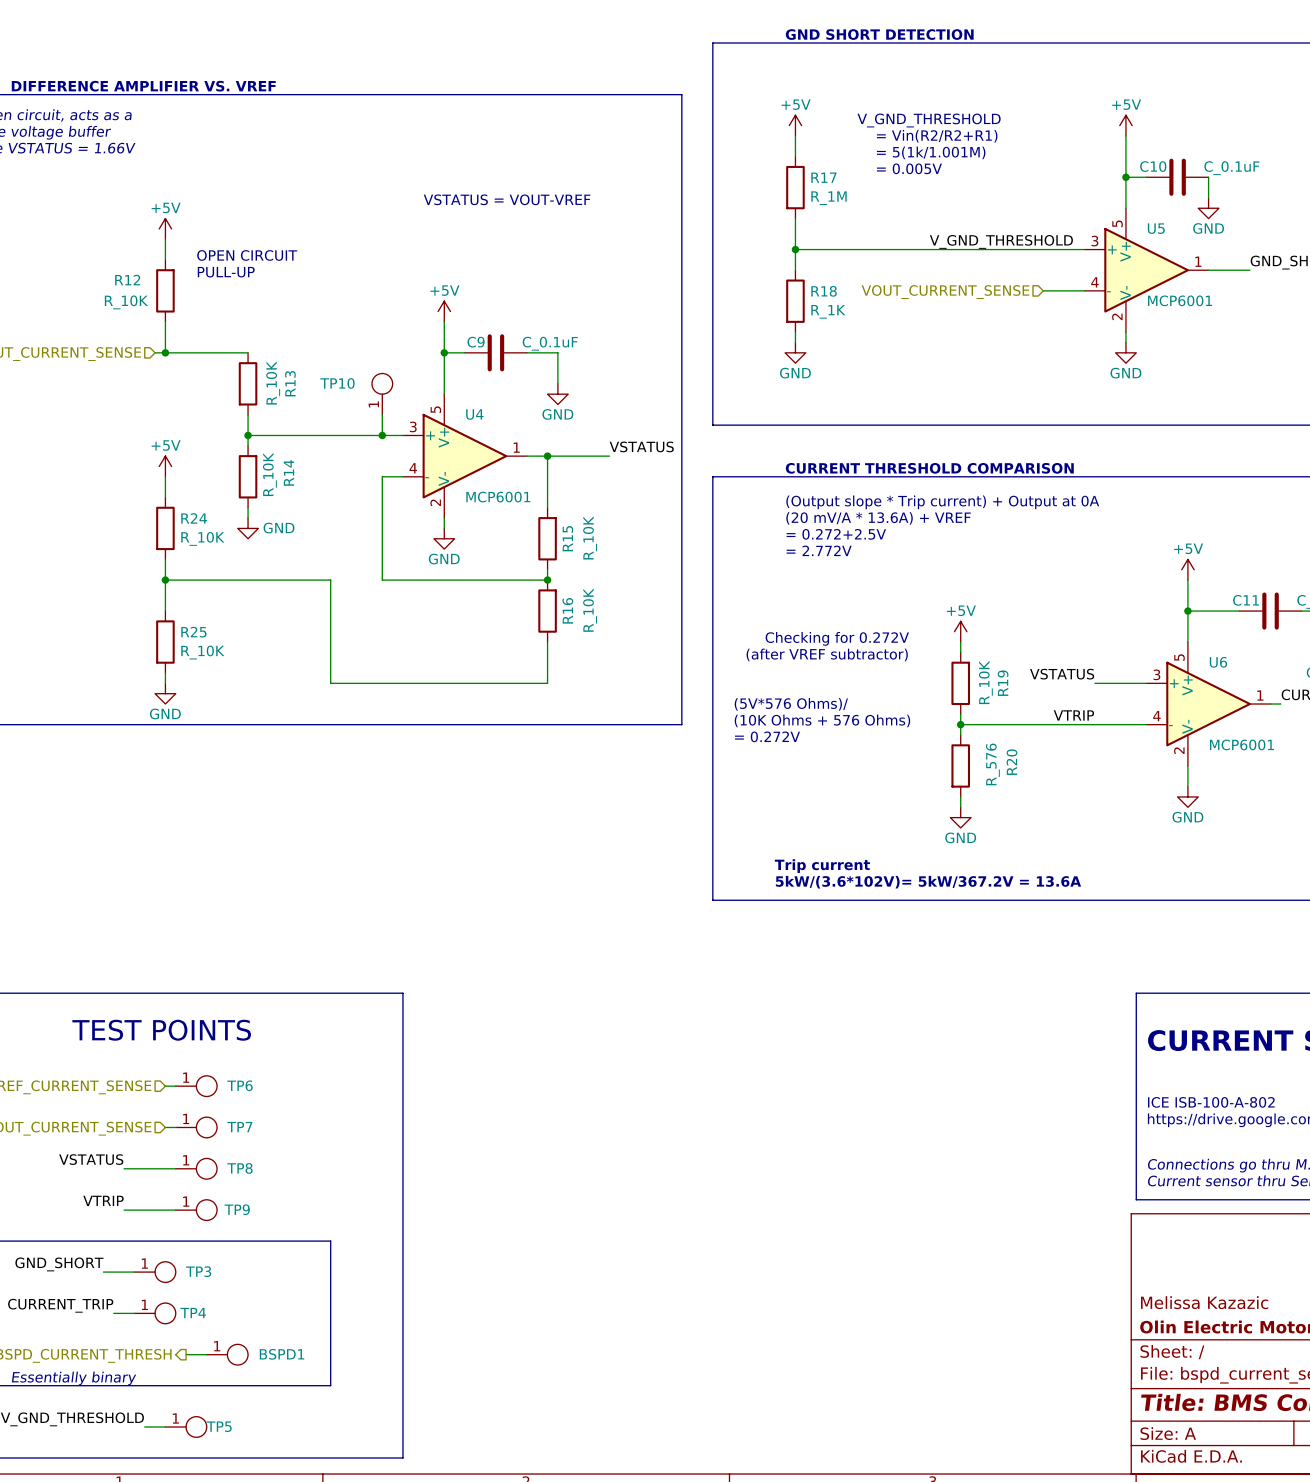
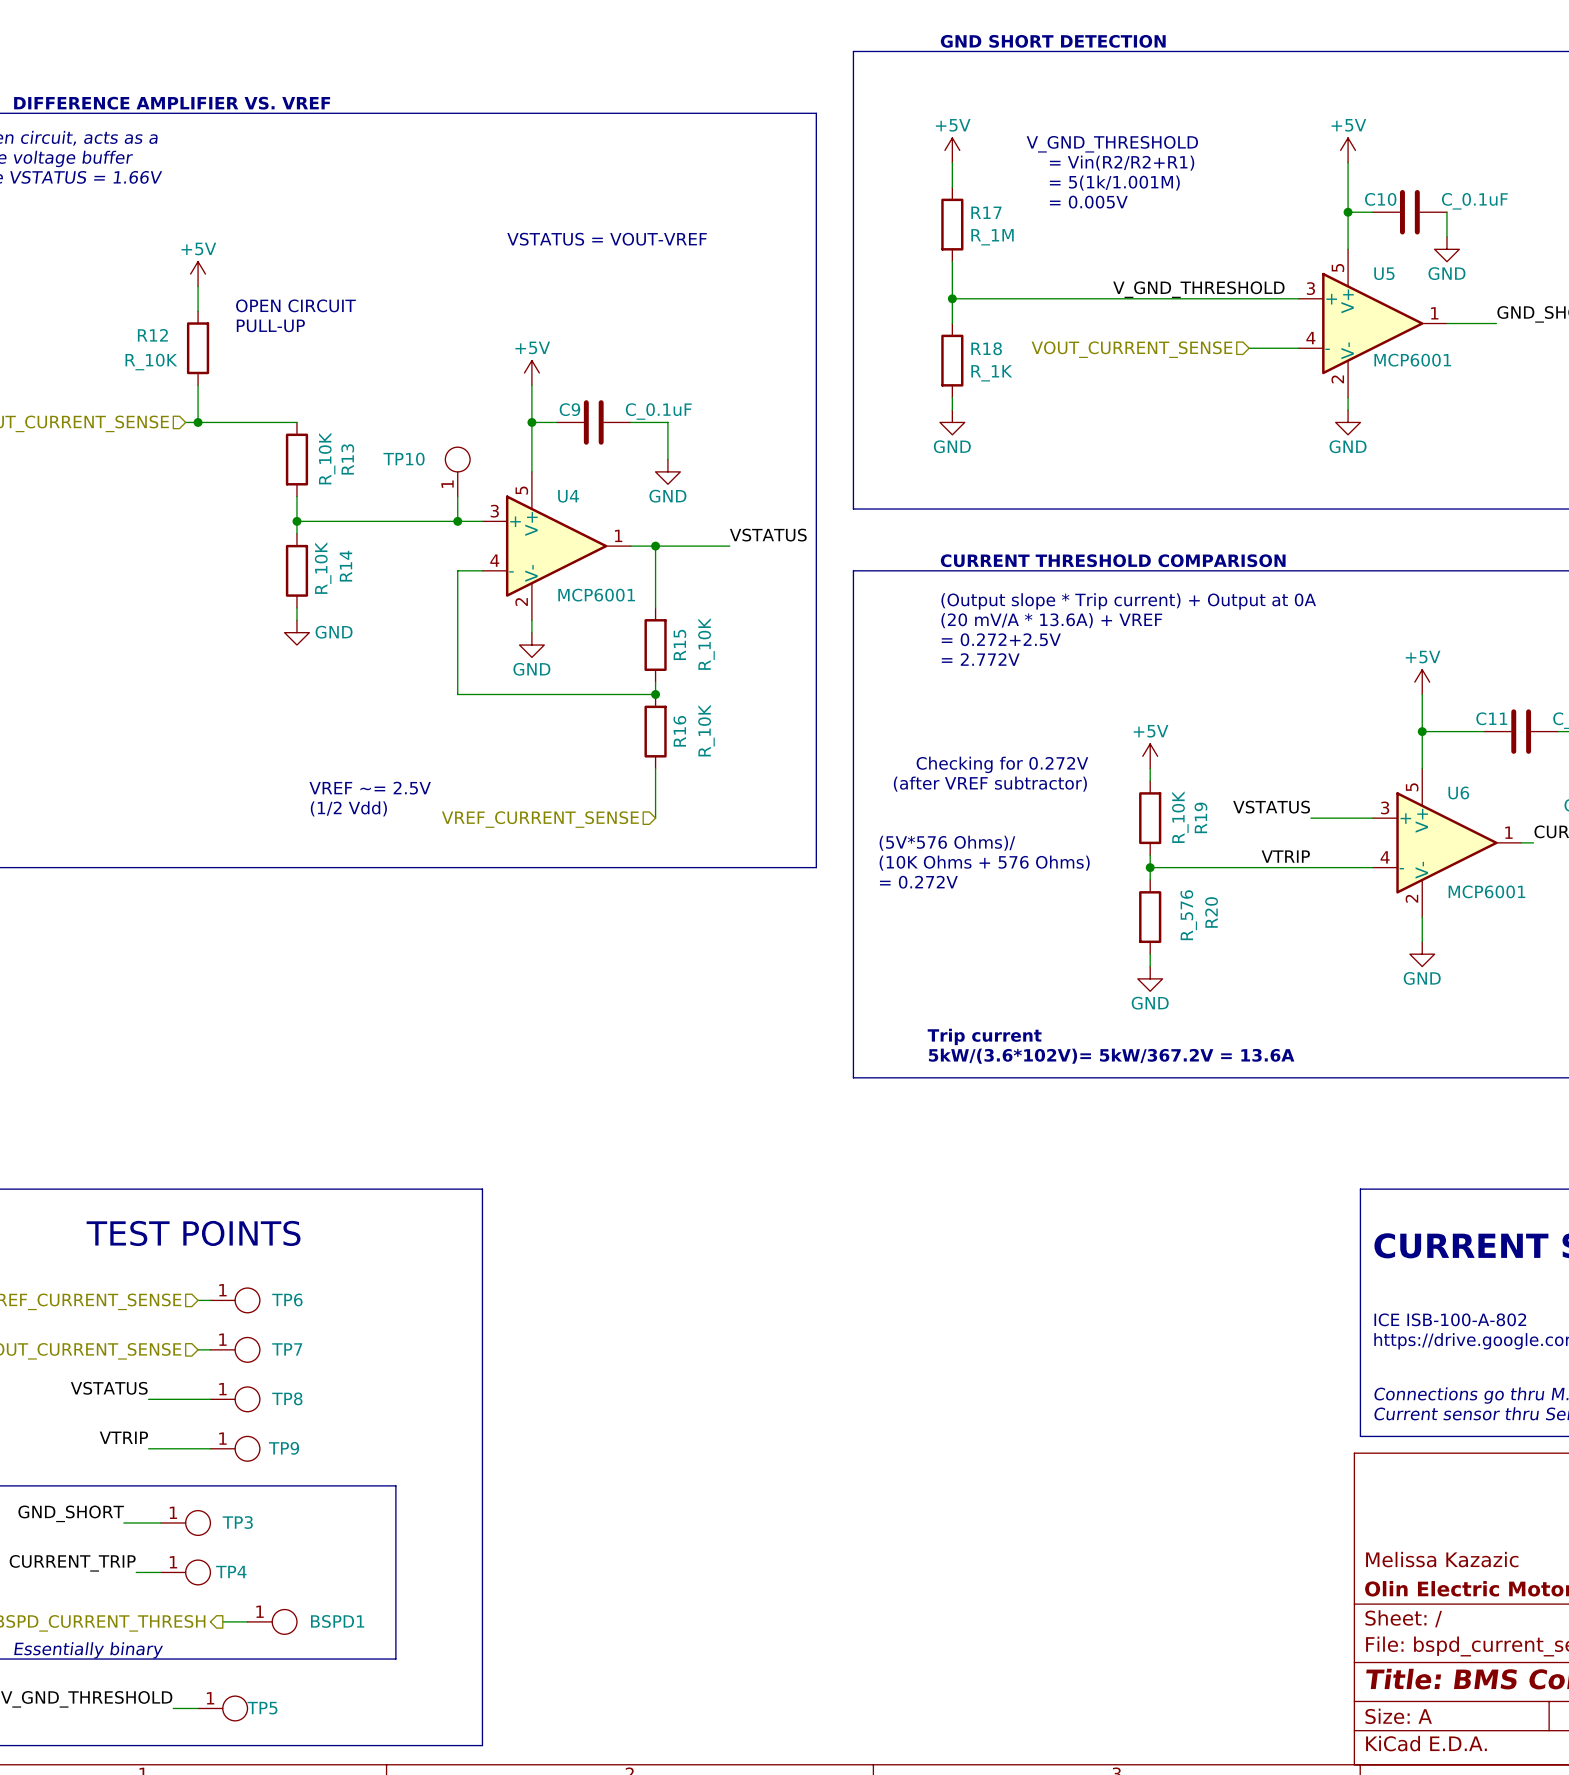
power symbol: +5V (165, 466) -> none
wire: (165, 476) (165, 497) -> none
R24: R_10K (165, 528) -> none
wire: (165, 559) (165, 611) -> none
wire: (165, 580) (330, 580) (330, 683) (547, 683) -> none
junction: (165, 580) -> none
R25: R_10K (165, 642) -> none
text: none -> VREF ~= 2.5V (370, 788)
wire: (165, 673) (165, 683) -> none
text: none -> (1/2 Vdd) (348, 808)
hierarchical label: none -> VREF_CURRENT_SENSE (540, 819)
power symbol: GND (165, 693) -> none

